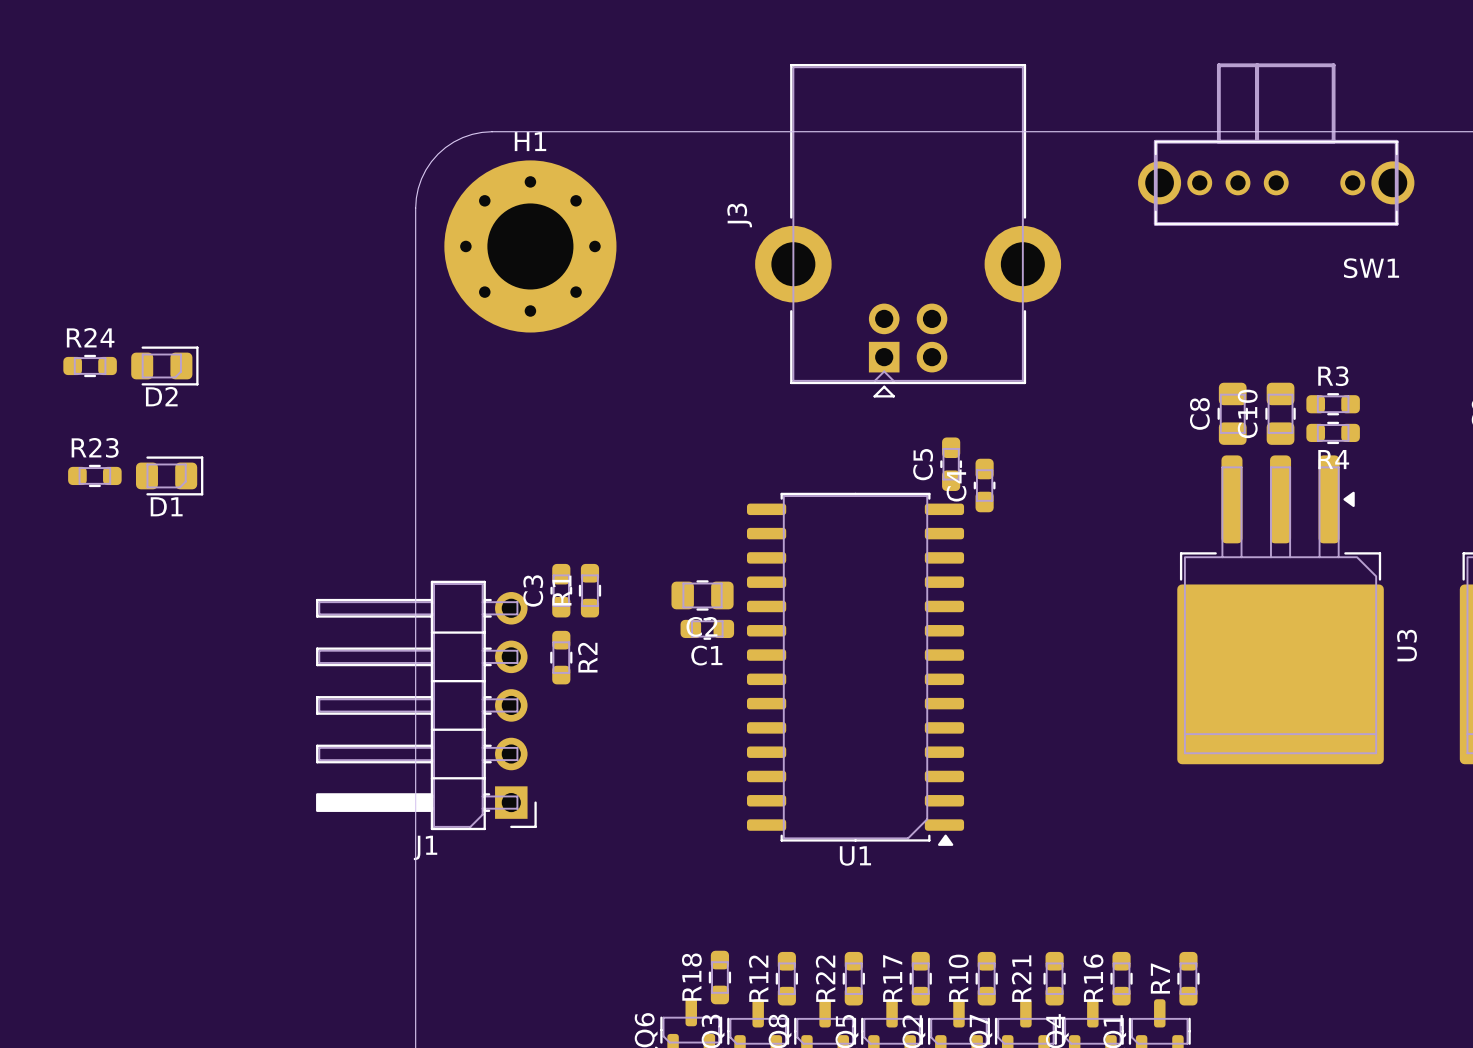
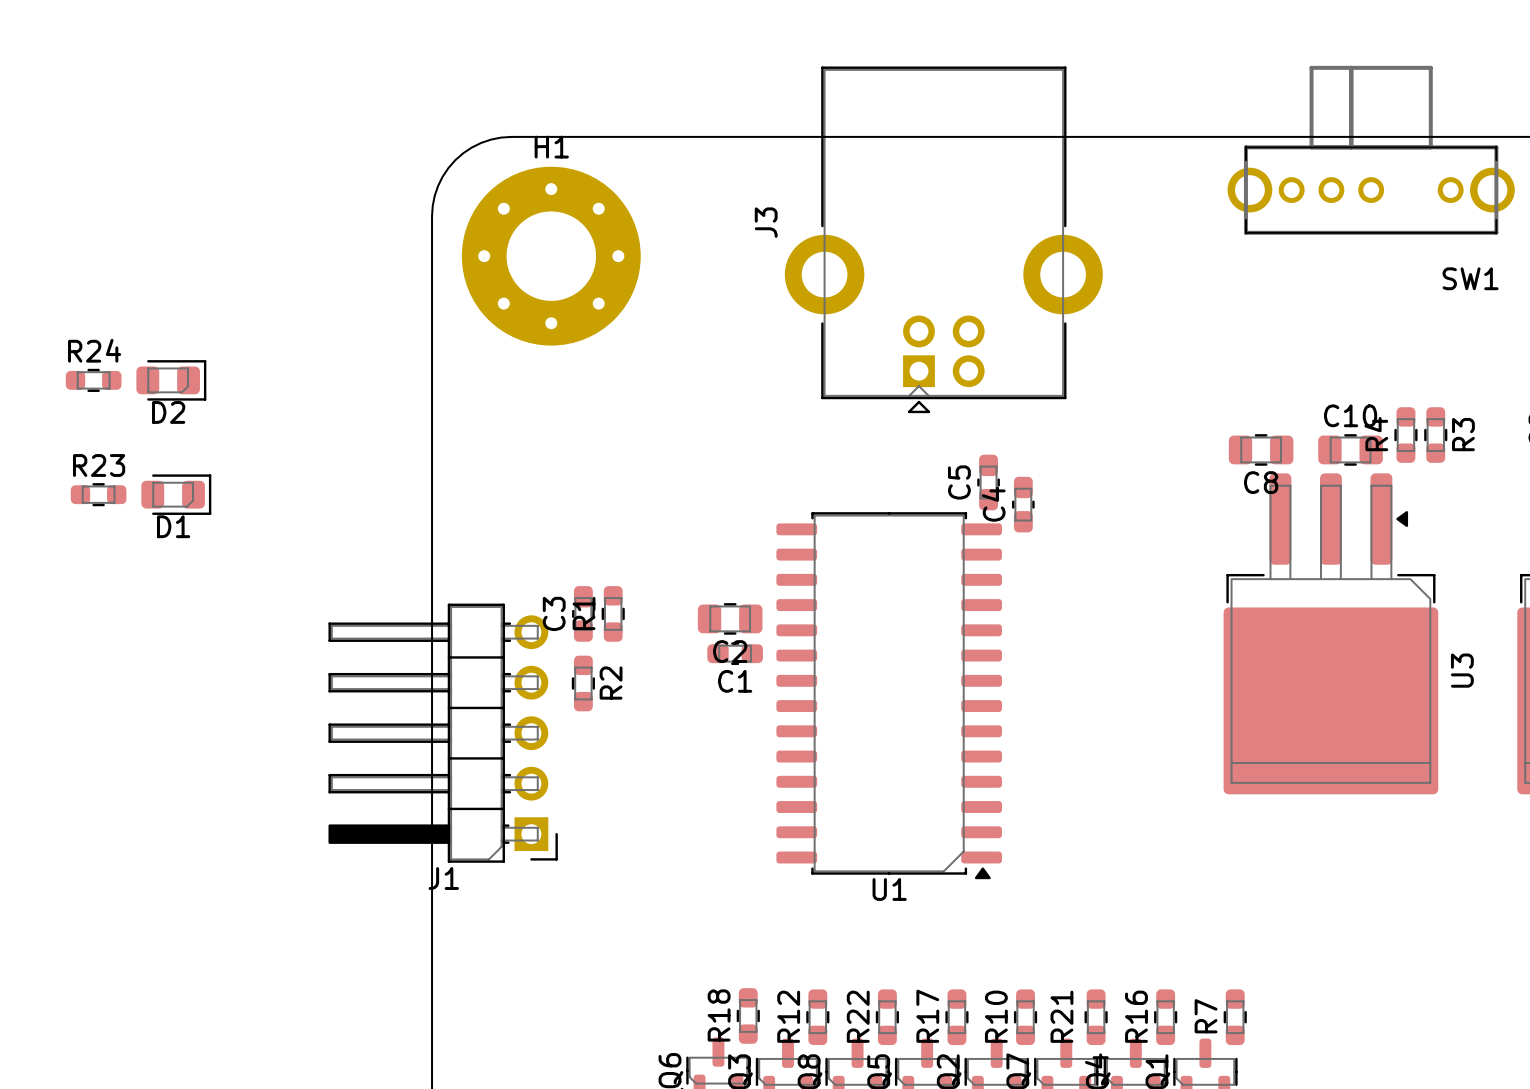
SW1 position: (1276, 144) -> (1371, 150)
R3 rotation: 0° (1333, 404) -> 90° clockwise (1435, 435)
R3 position: (1333, 404) -> (1435, 435)
C8 name position: C8 (1199, 413) -> C8 (1261, 482)
C8 rotation: 0° (1232, 413) -> 90° clockwise (1261, 449)
C10 rotation: 0° (1280, 413) -> 90° clockwise (1350, 449)
R4 rotation: 0° (1333, 432) -> 90° clockwise (1405, 435)

